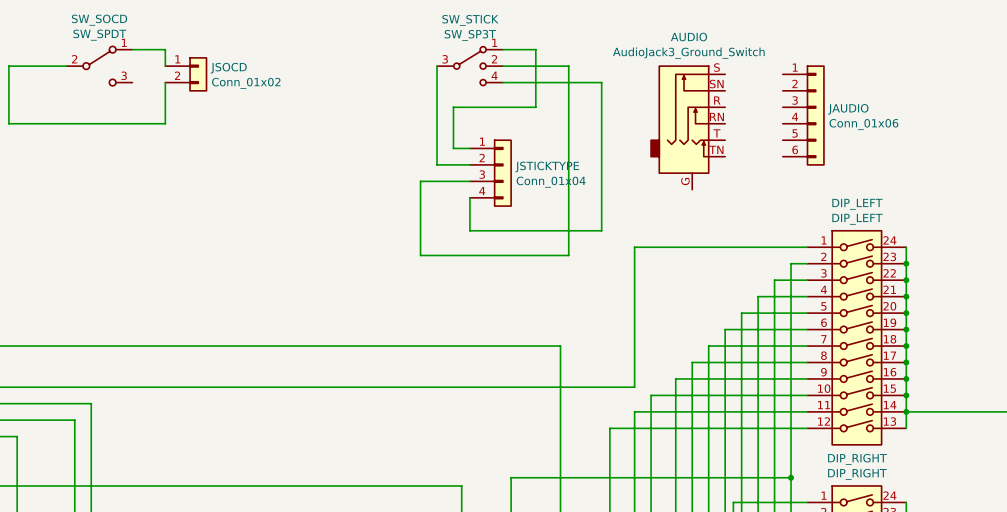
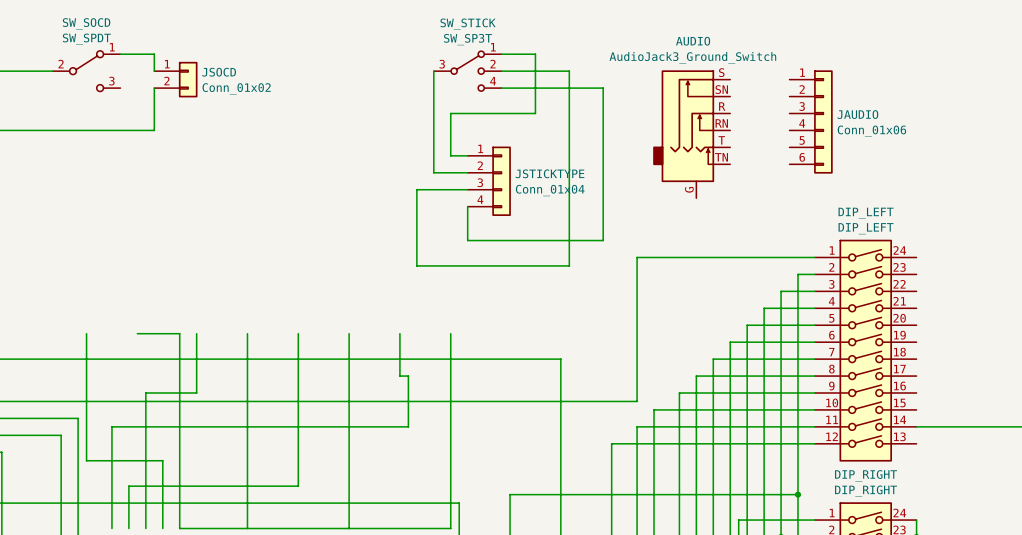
wire: (906, 247) (906, 428) -> none
junction: (906, 263) -> none
junction: (906, 280) -> none
junction: (906, 296) -> none
junction: (906, 313) -> none
wire: none -> (86, 333) (86, 460) (162, 460) (162, 528)
wire: none -> (137, 333) (179, 333) (179, 528) (450, 528) (450, 333)
wire: none -> (196, 333) (196, 392) (145, 392) (145, 528)
wire: none -> (247, 333) (247, 528)
wire: none -> (298, 333) (298, 486) (128, 486) (128, 528)
wire: none -> (349, 333) (349, 528)
wire: none -> (399, 333) (399, 376) (408, 376) (408, 426) (111, 426) (111, 528)
junction: (906, 329) -> none
junction: (906, 346) -> none
junction: (906, 362) -> none
junction: (906, 378) -> none
junction: (906, 395) -> none
junction: (906, 411) -> none

